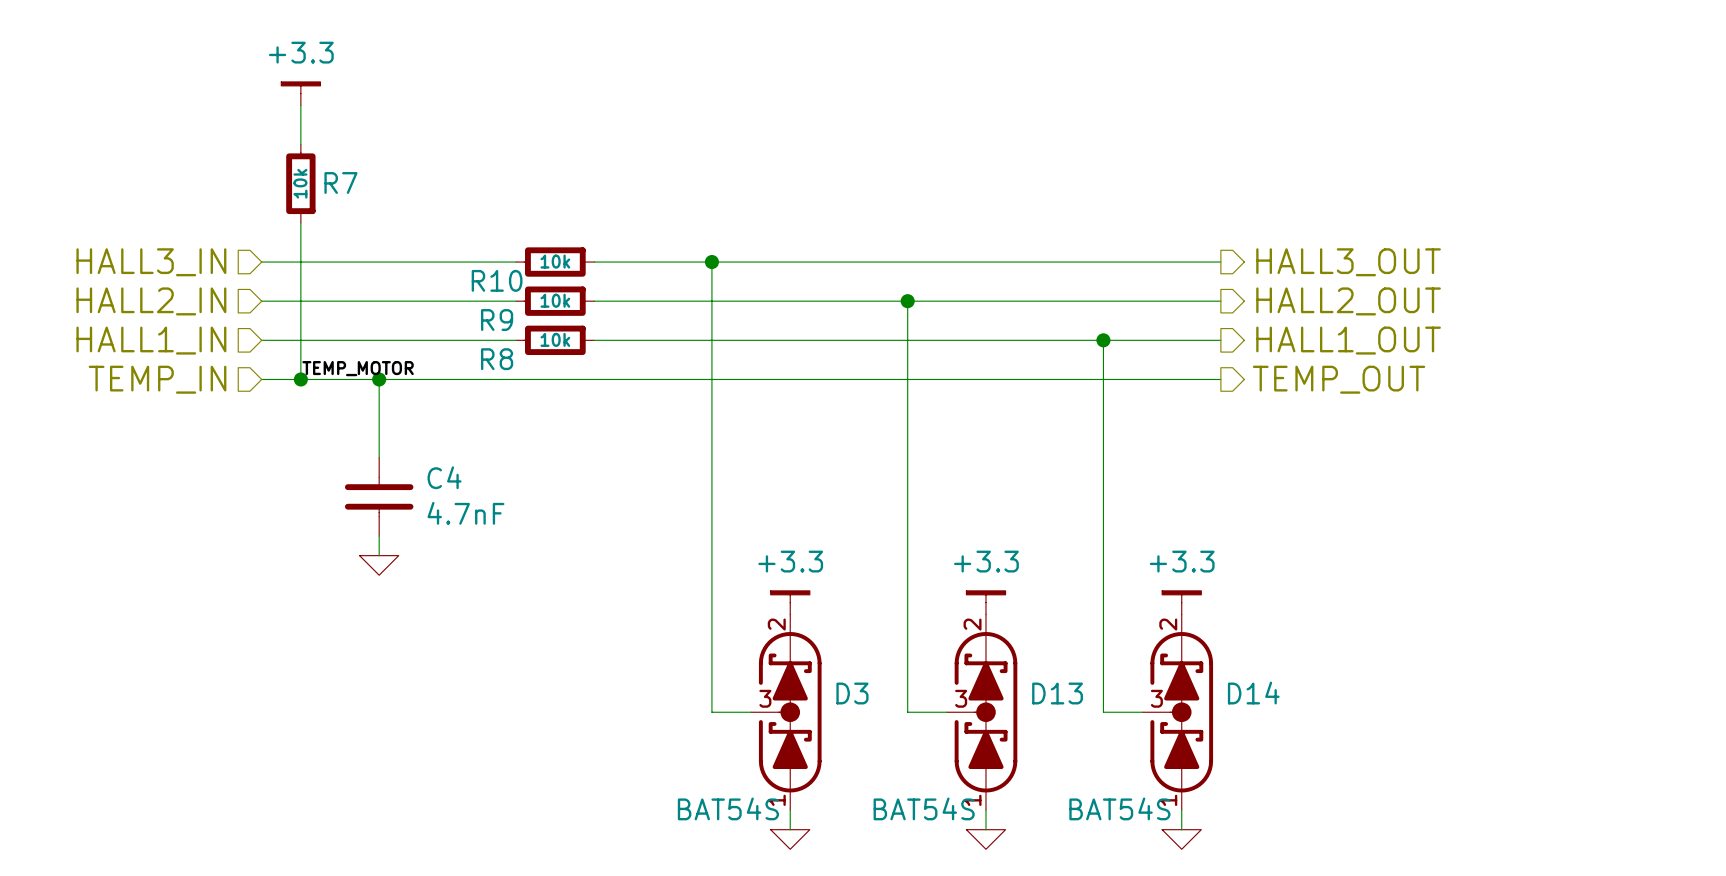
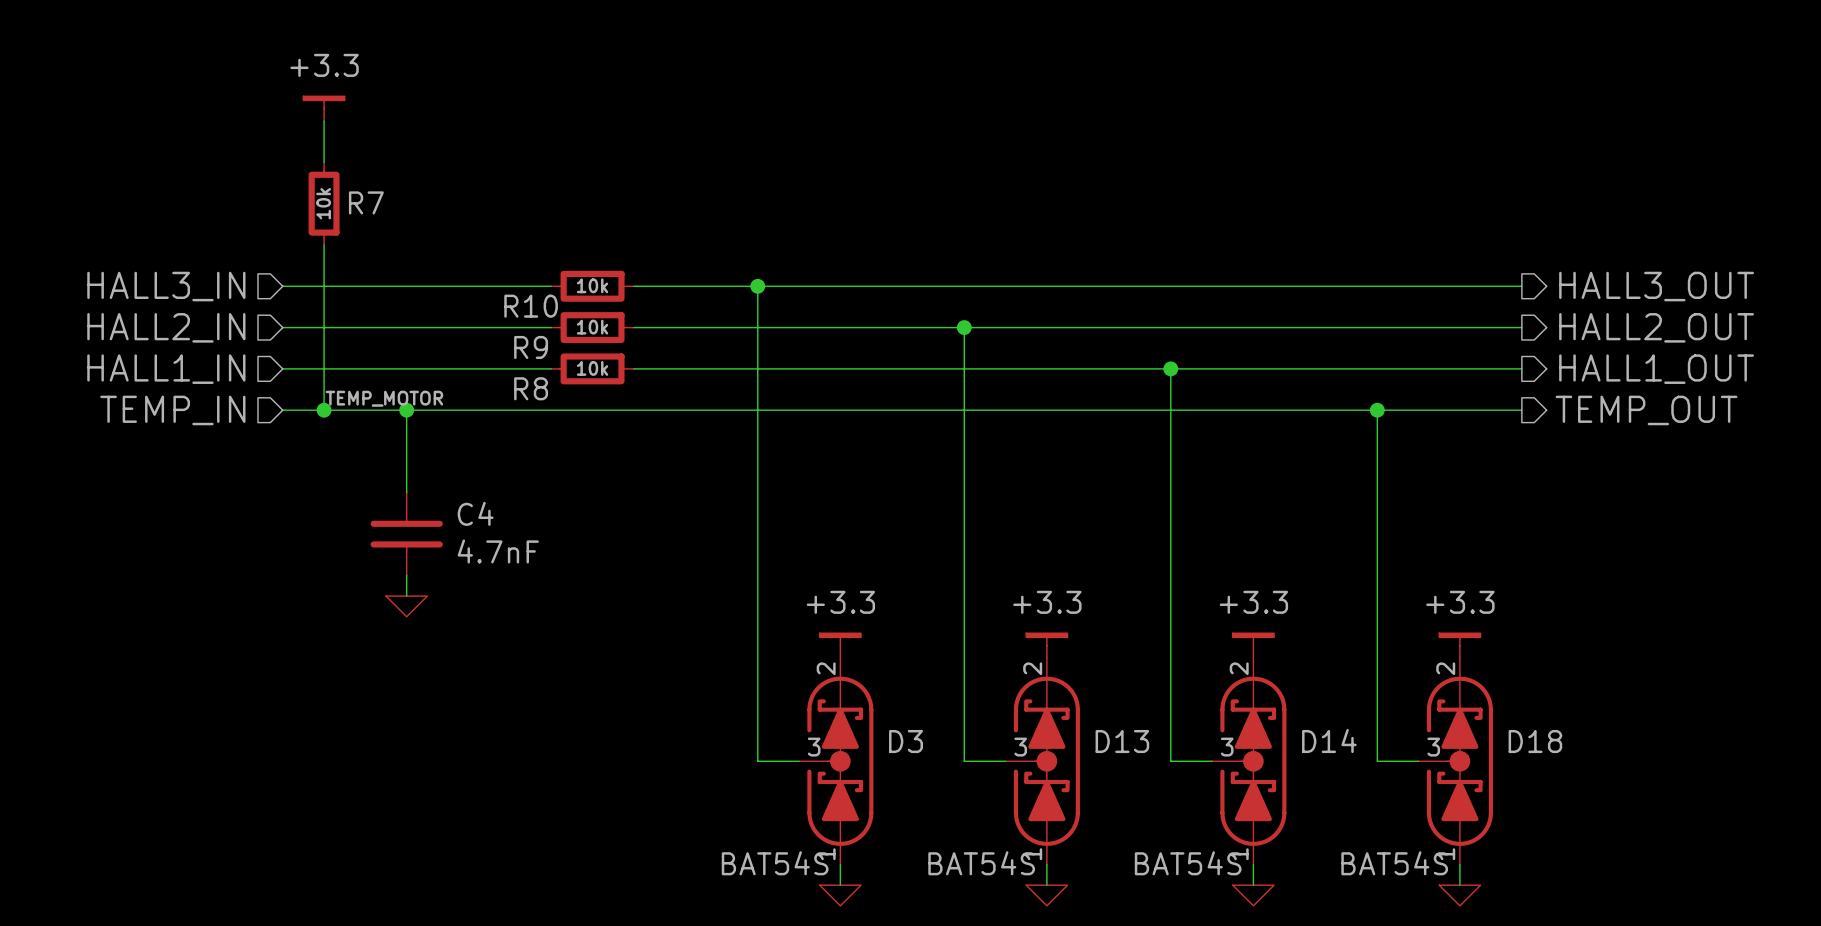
wire: none -> (1294, 286) (1521, 286)
hierarchical label position: HALL3_OUT (1348, 262) -> HALL3_OUT (1656, 286)
wire: none -> (1294, 327) (1521, 327)
hierarchical label position: HALL2_OUT (1348, 301) -> HALL2_OUT (1656, 327)
wire: none -> (1294, 368) (1521, 368)
hierarchical label position: HALL1_OUT (1348, 340) -> HALL1_OUT (1656, 369)
wire: none -> (1294, 410) (1521, 410)
wire: none -> (1377, 410) (1377, 761) (1418, 761)
junction: none -> (1377, 410)
hierarchical label position: TEMP_OUT (1339, 379) -> TEMP_OUT (1646, 410)
power symbol: none -> +3.3 (1459, 645)
D18: none -> BAT54S (1455, 761)
wire: none -> (1459, 864) (1459, 885)
power symbol: none -> (1459, 895)

